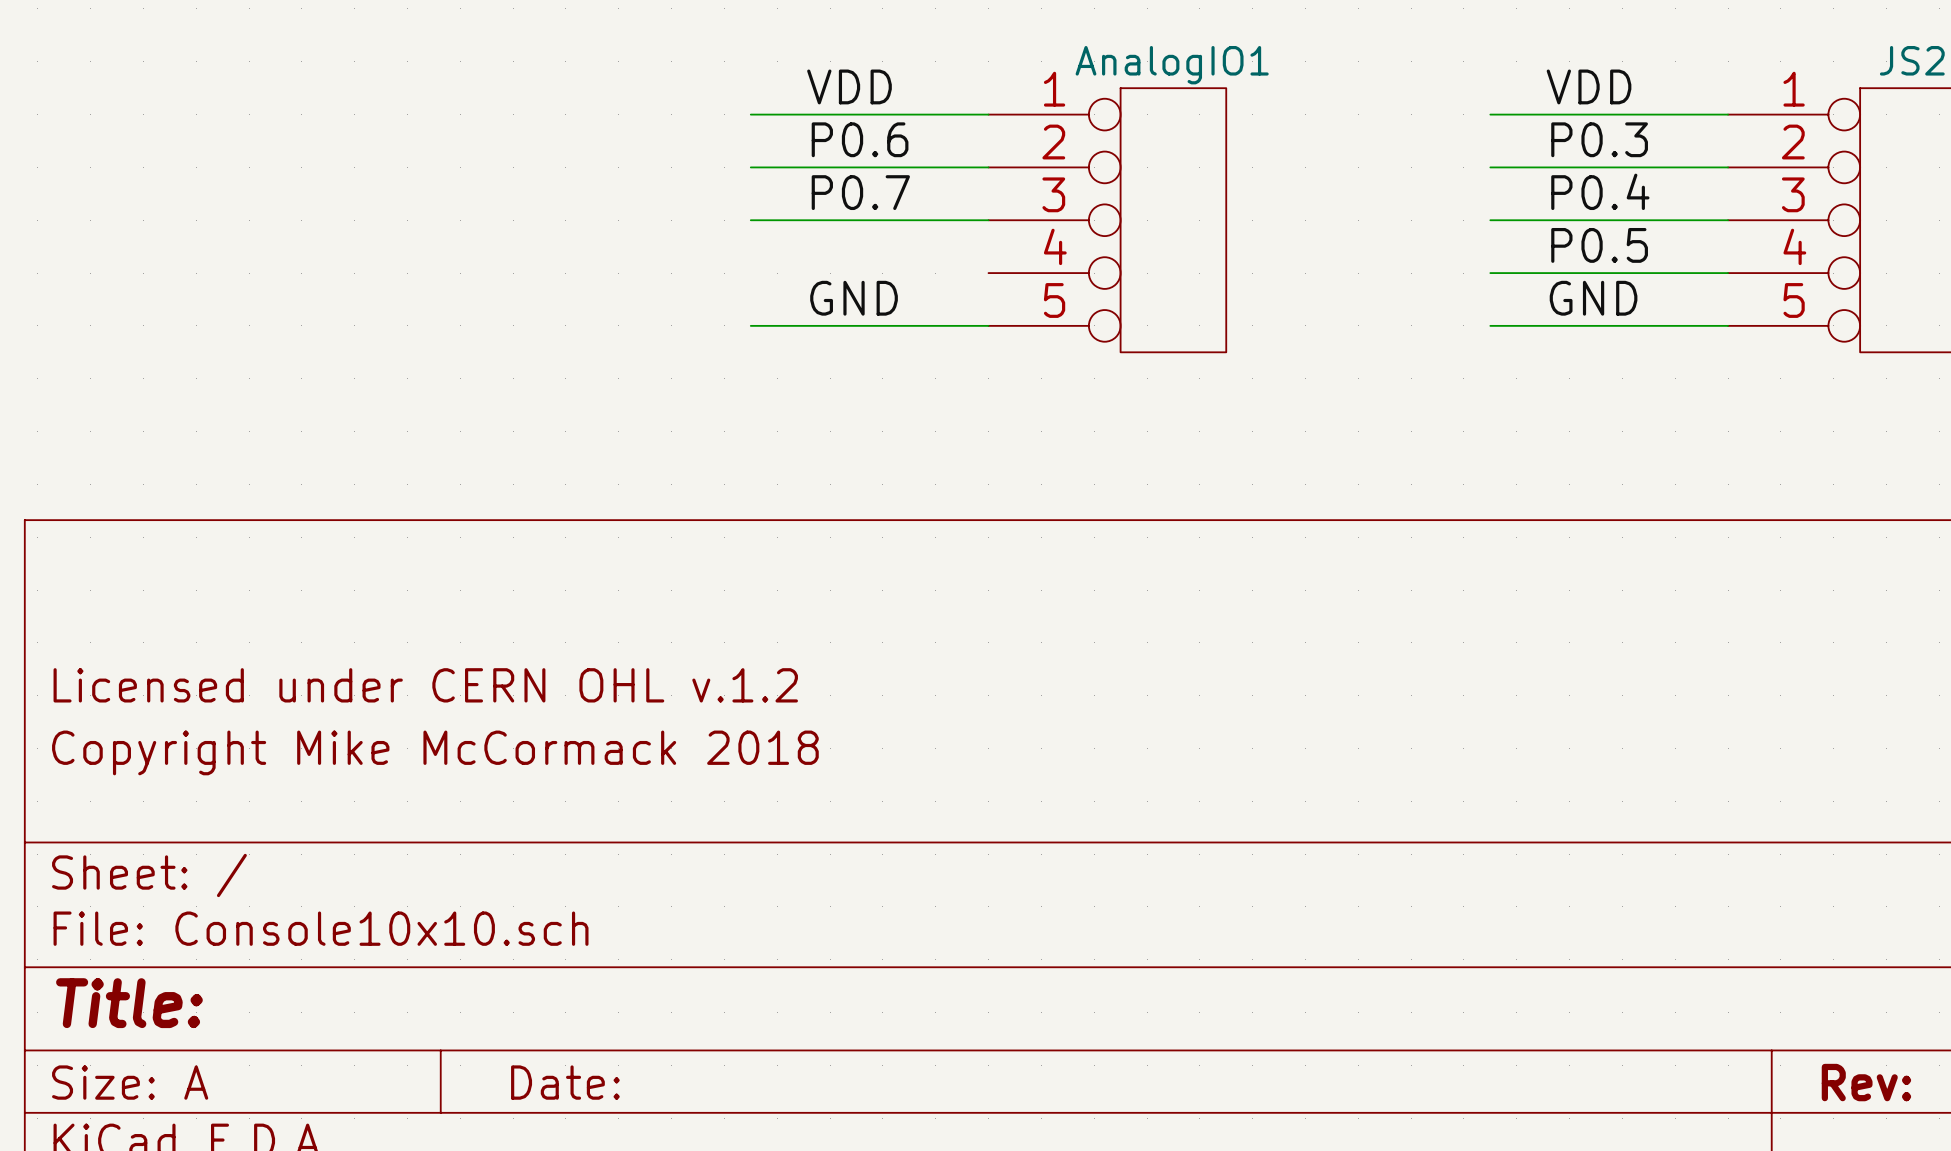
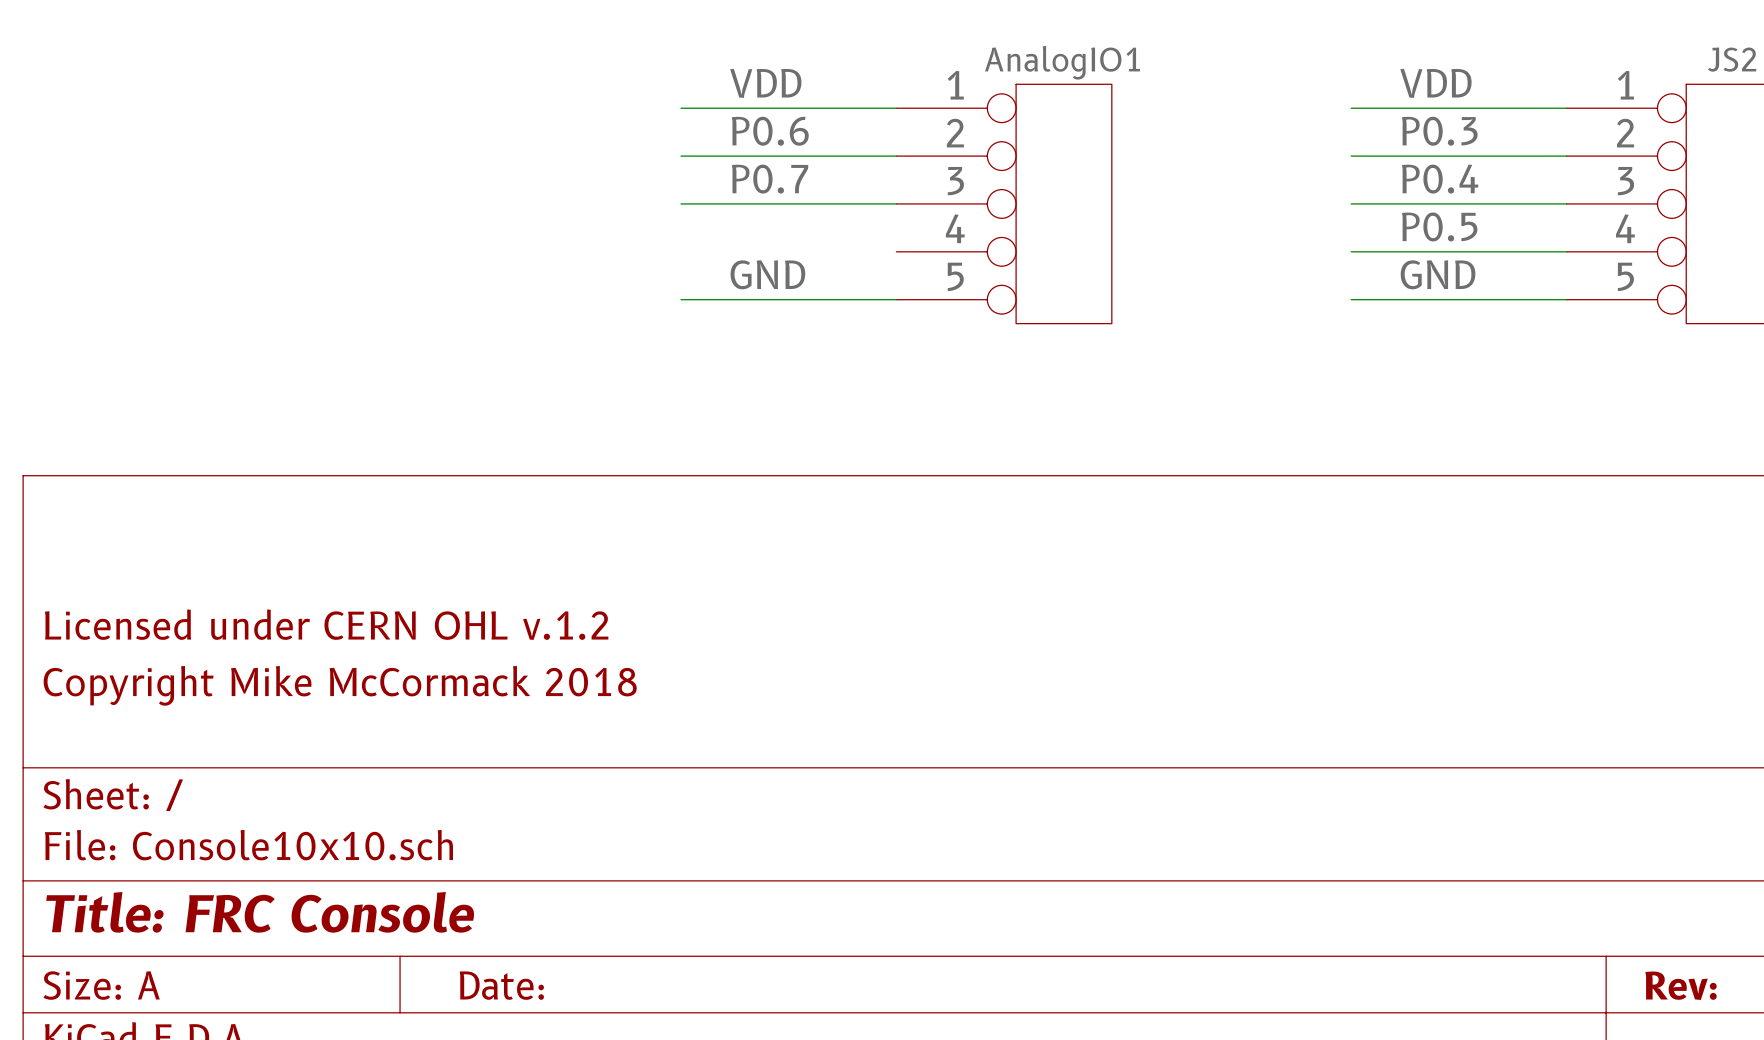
title block: Title: (129, 1003) -> Title: FRC Console (260, 912)

